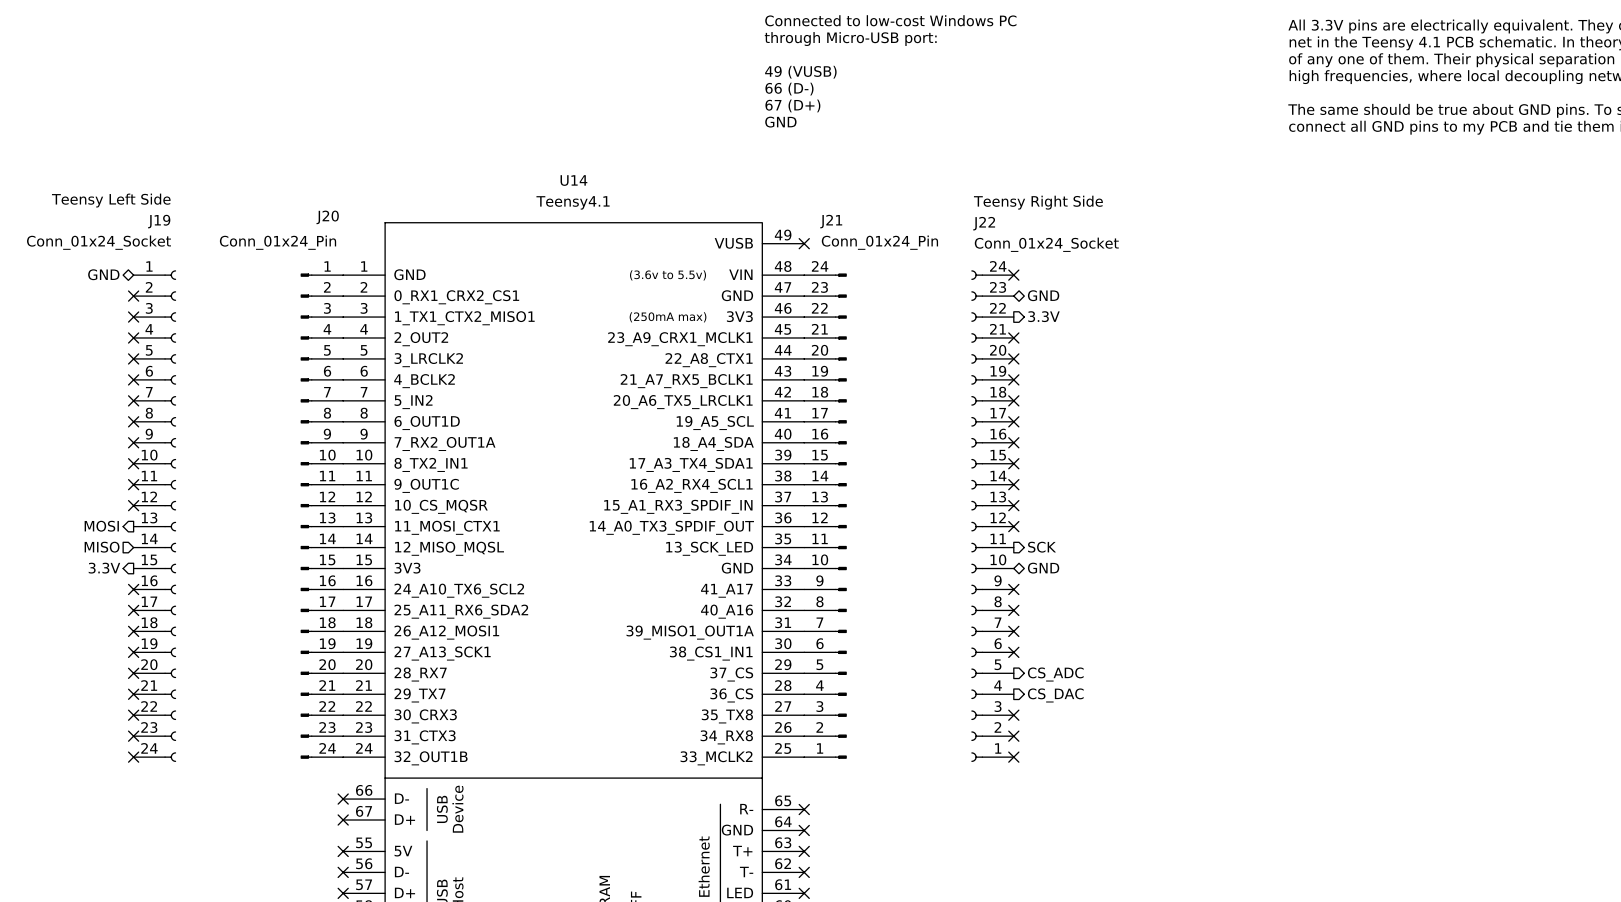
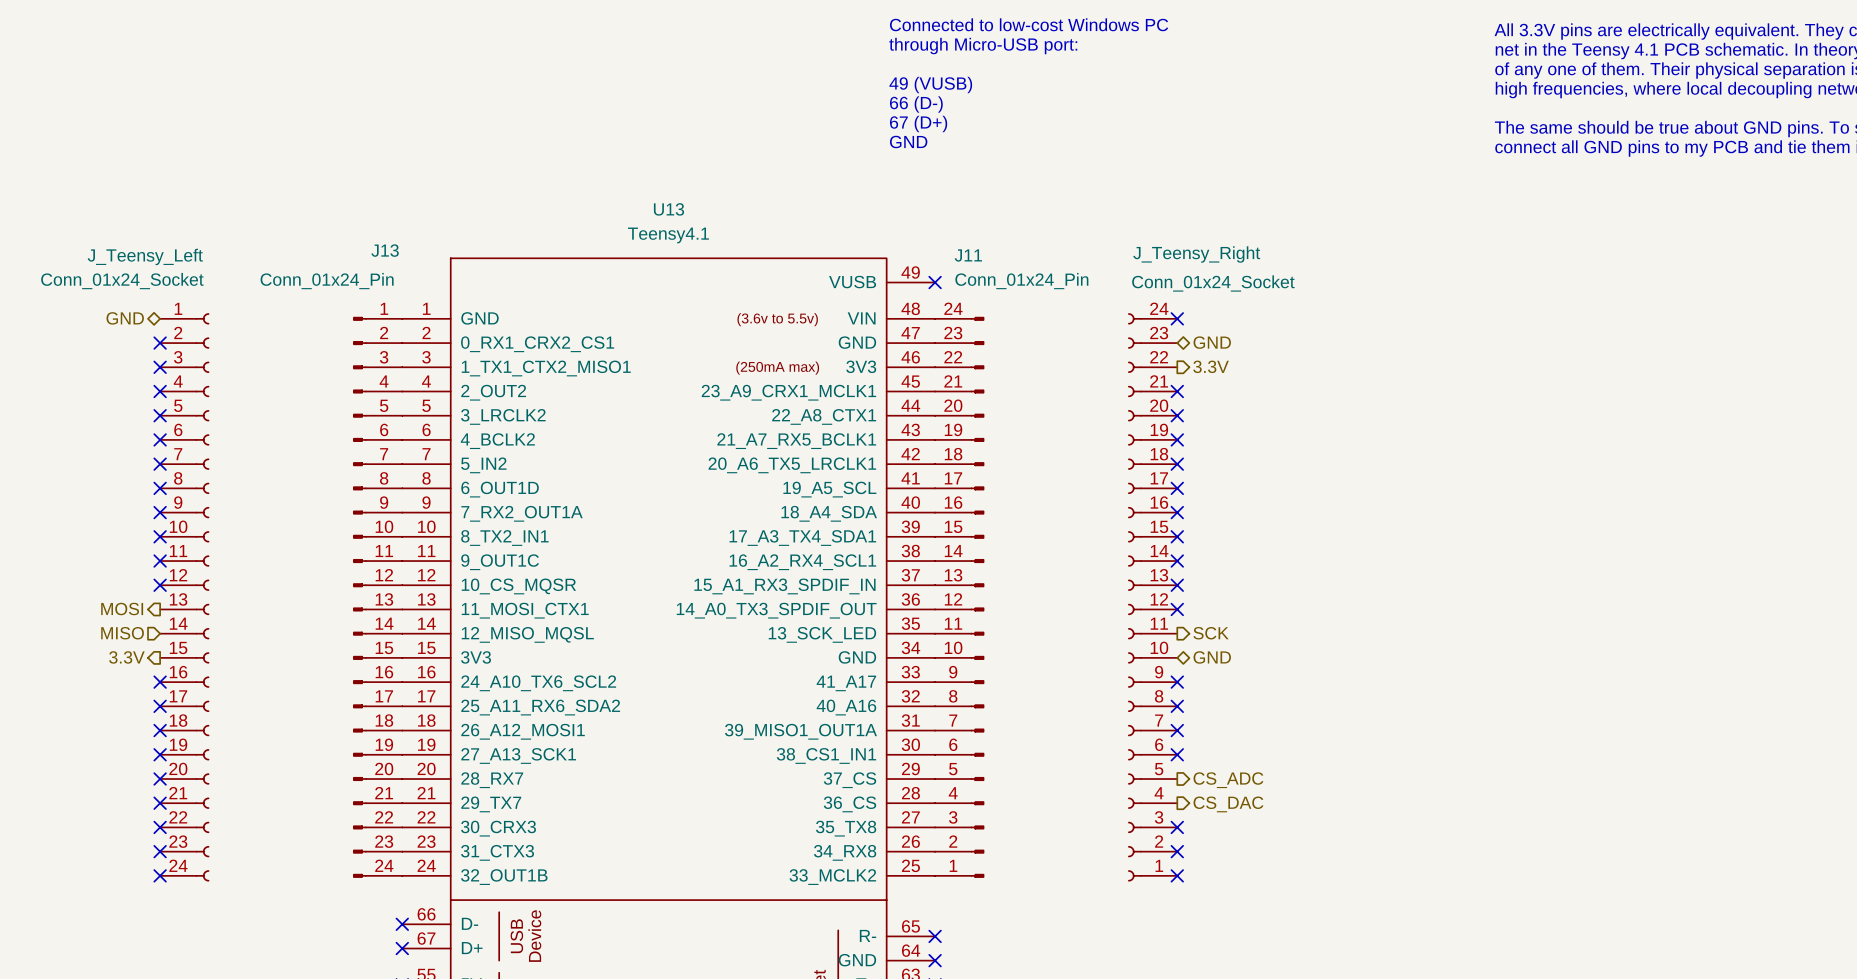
U14 name: U14 (573, 180) -> U13 (668, 209)
J19 text: Teensy Left Side (111, 200) -> none
J22 text: Teensy Right Side (1038, 202) -> none
J20 name: J20 (327, 217) -> J13 (385, 250)
J19 name: J19 (159, 221) -> J_Teensy_Left (145, 256)
J21 name: J21 (831, 221) -> J11 (968, 255)
J22 name: J22 (984, 223) -> J_Teensy_Right (1196, 254)

